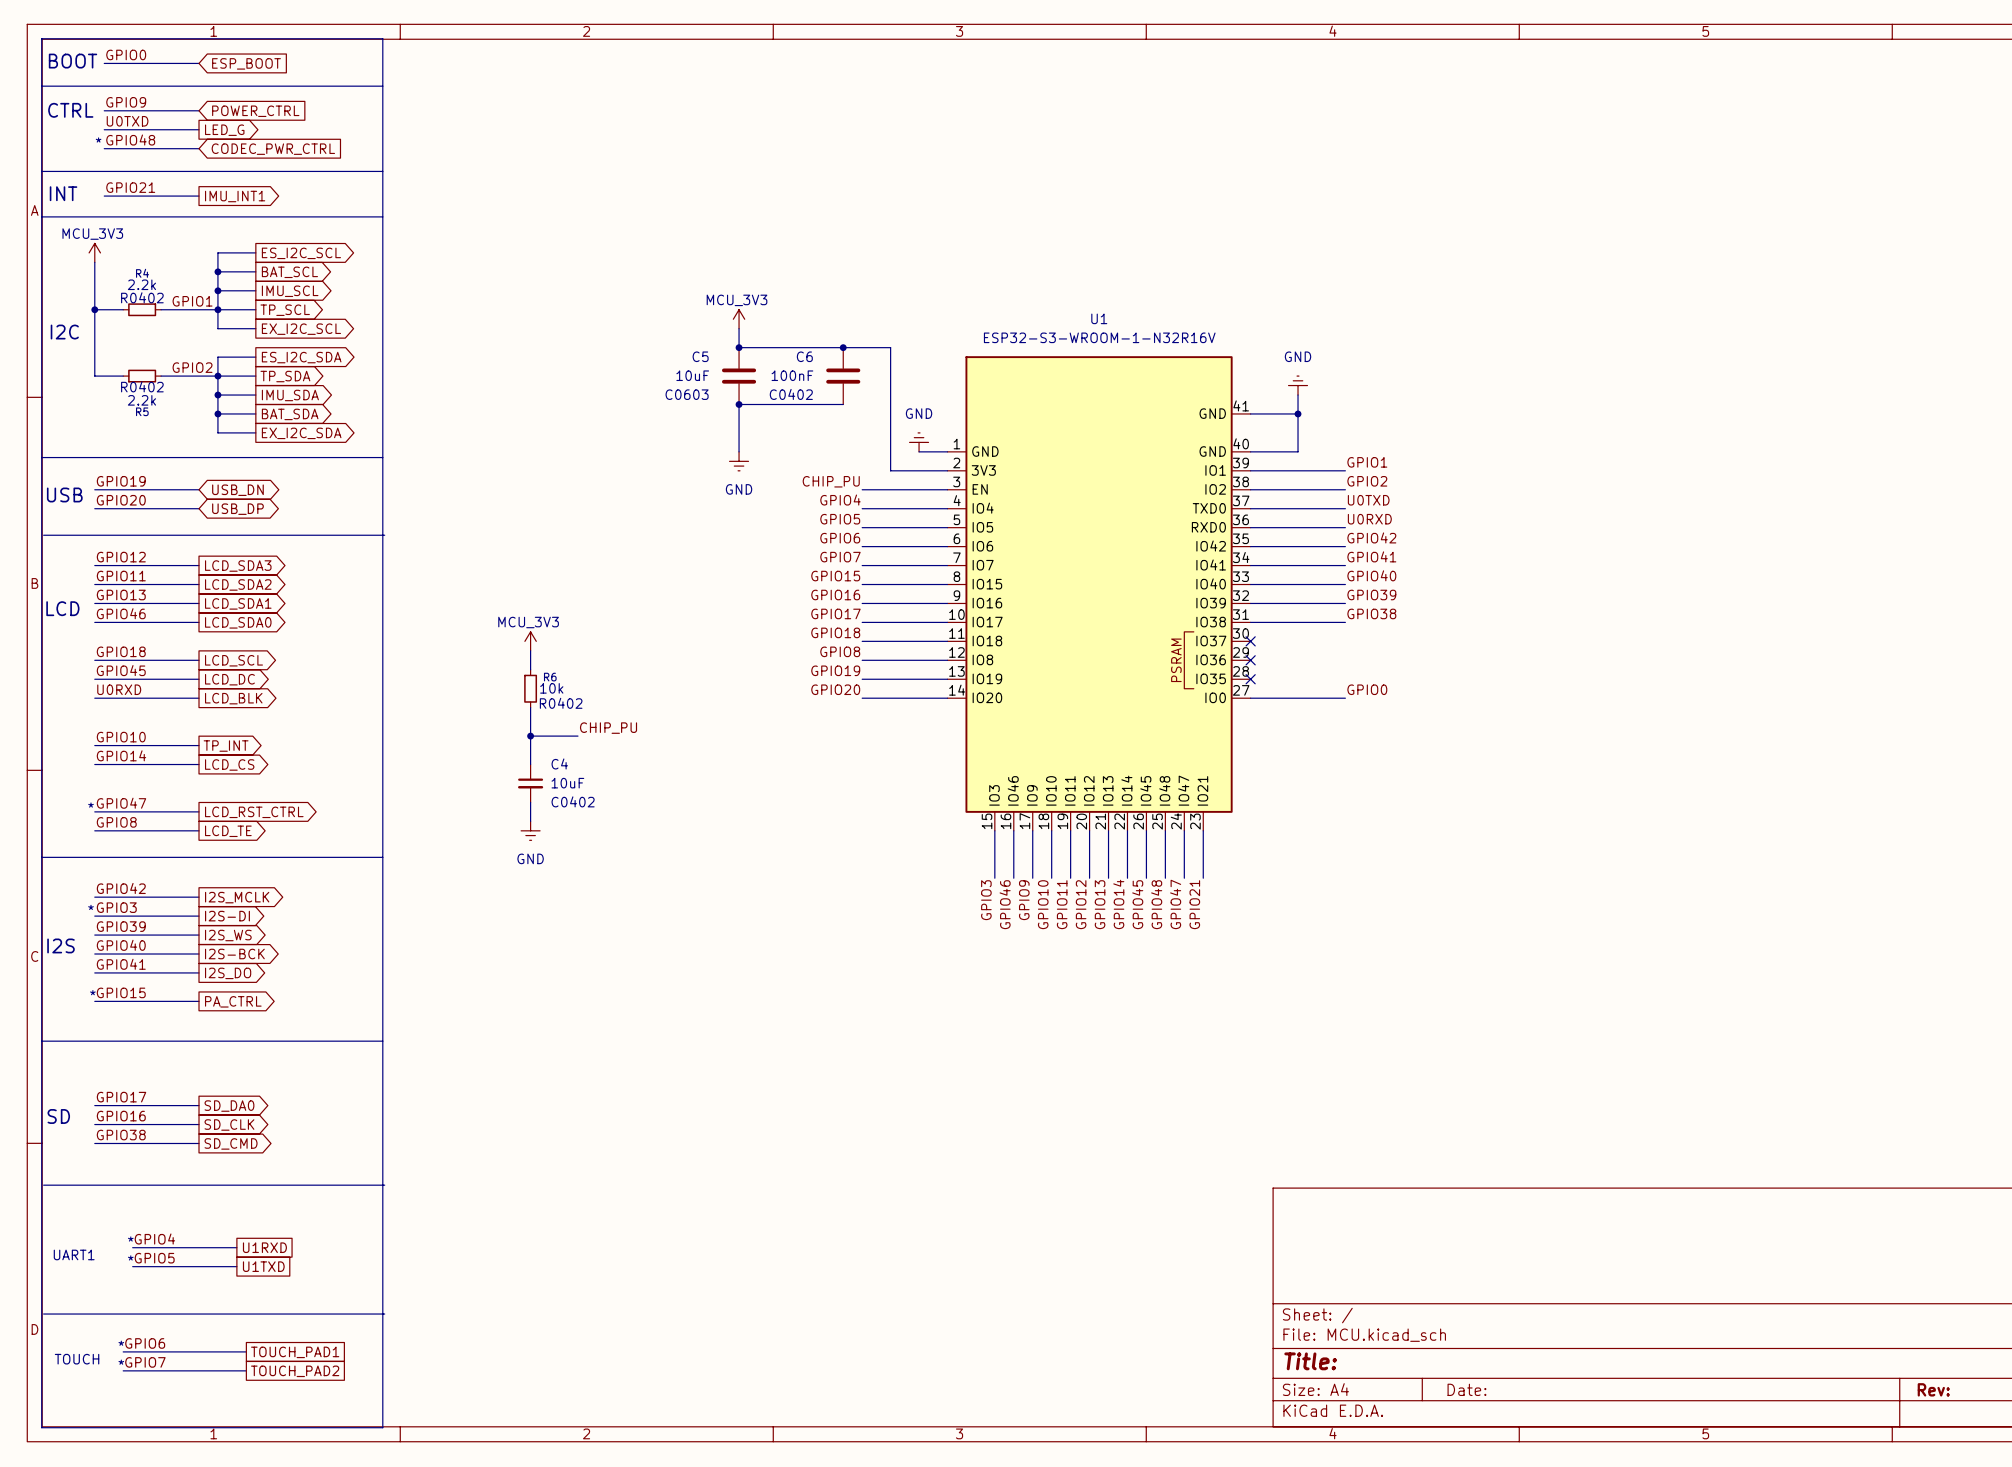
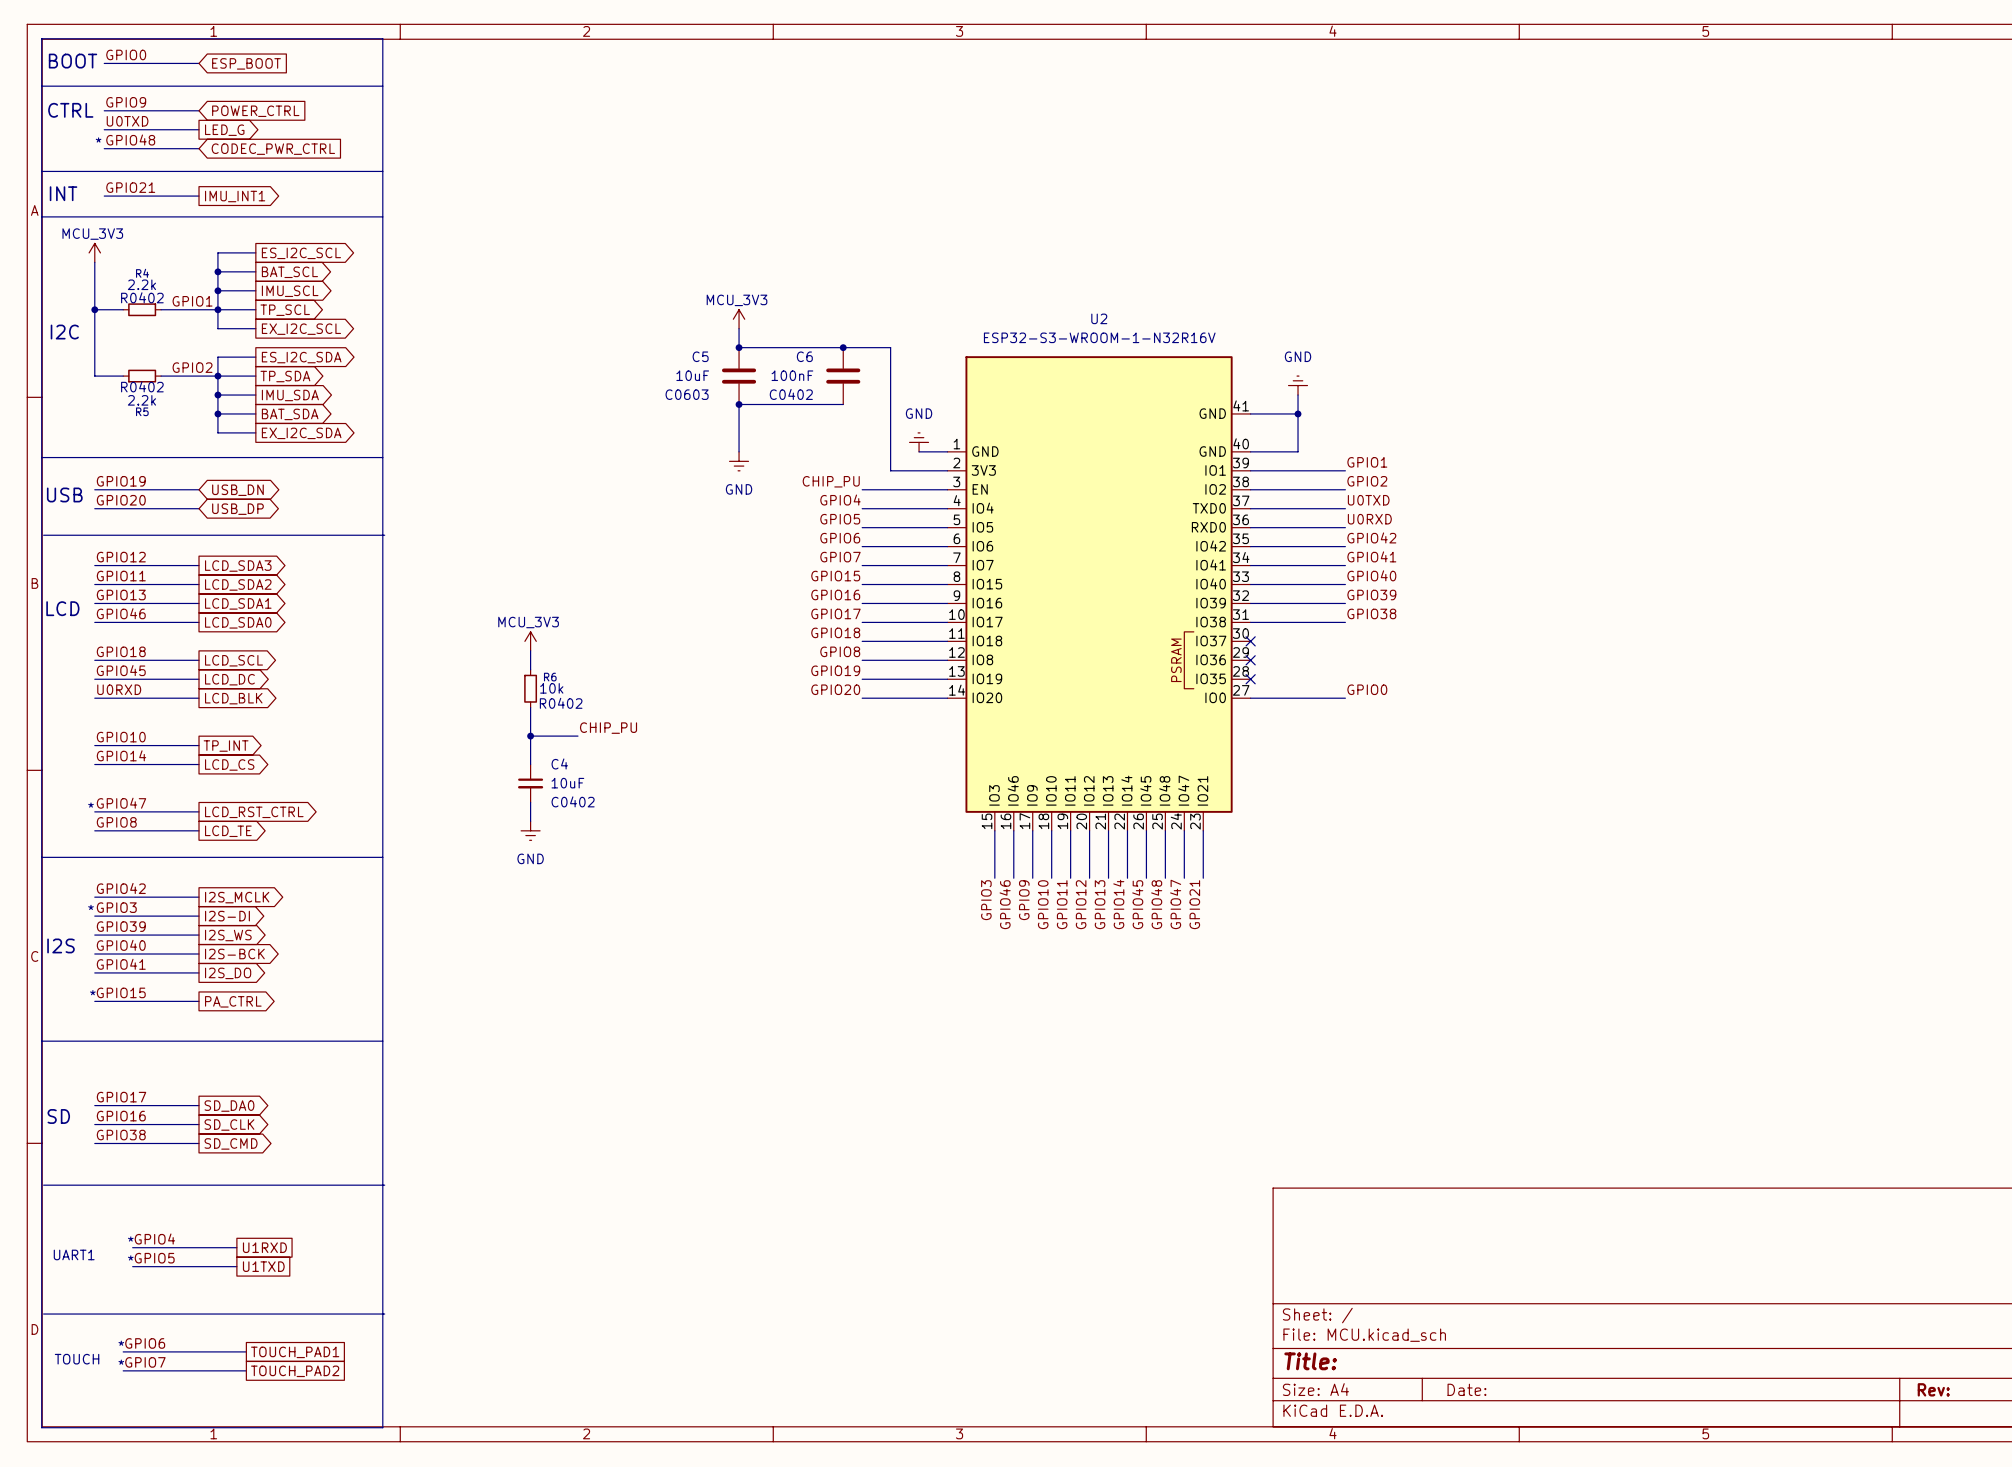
U1 name: U1 (1099, 318) -> U2 (1099, 318)

